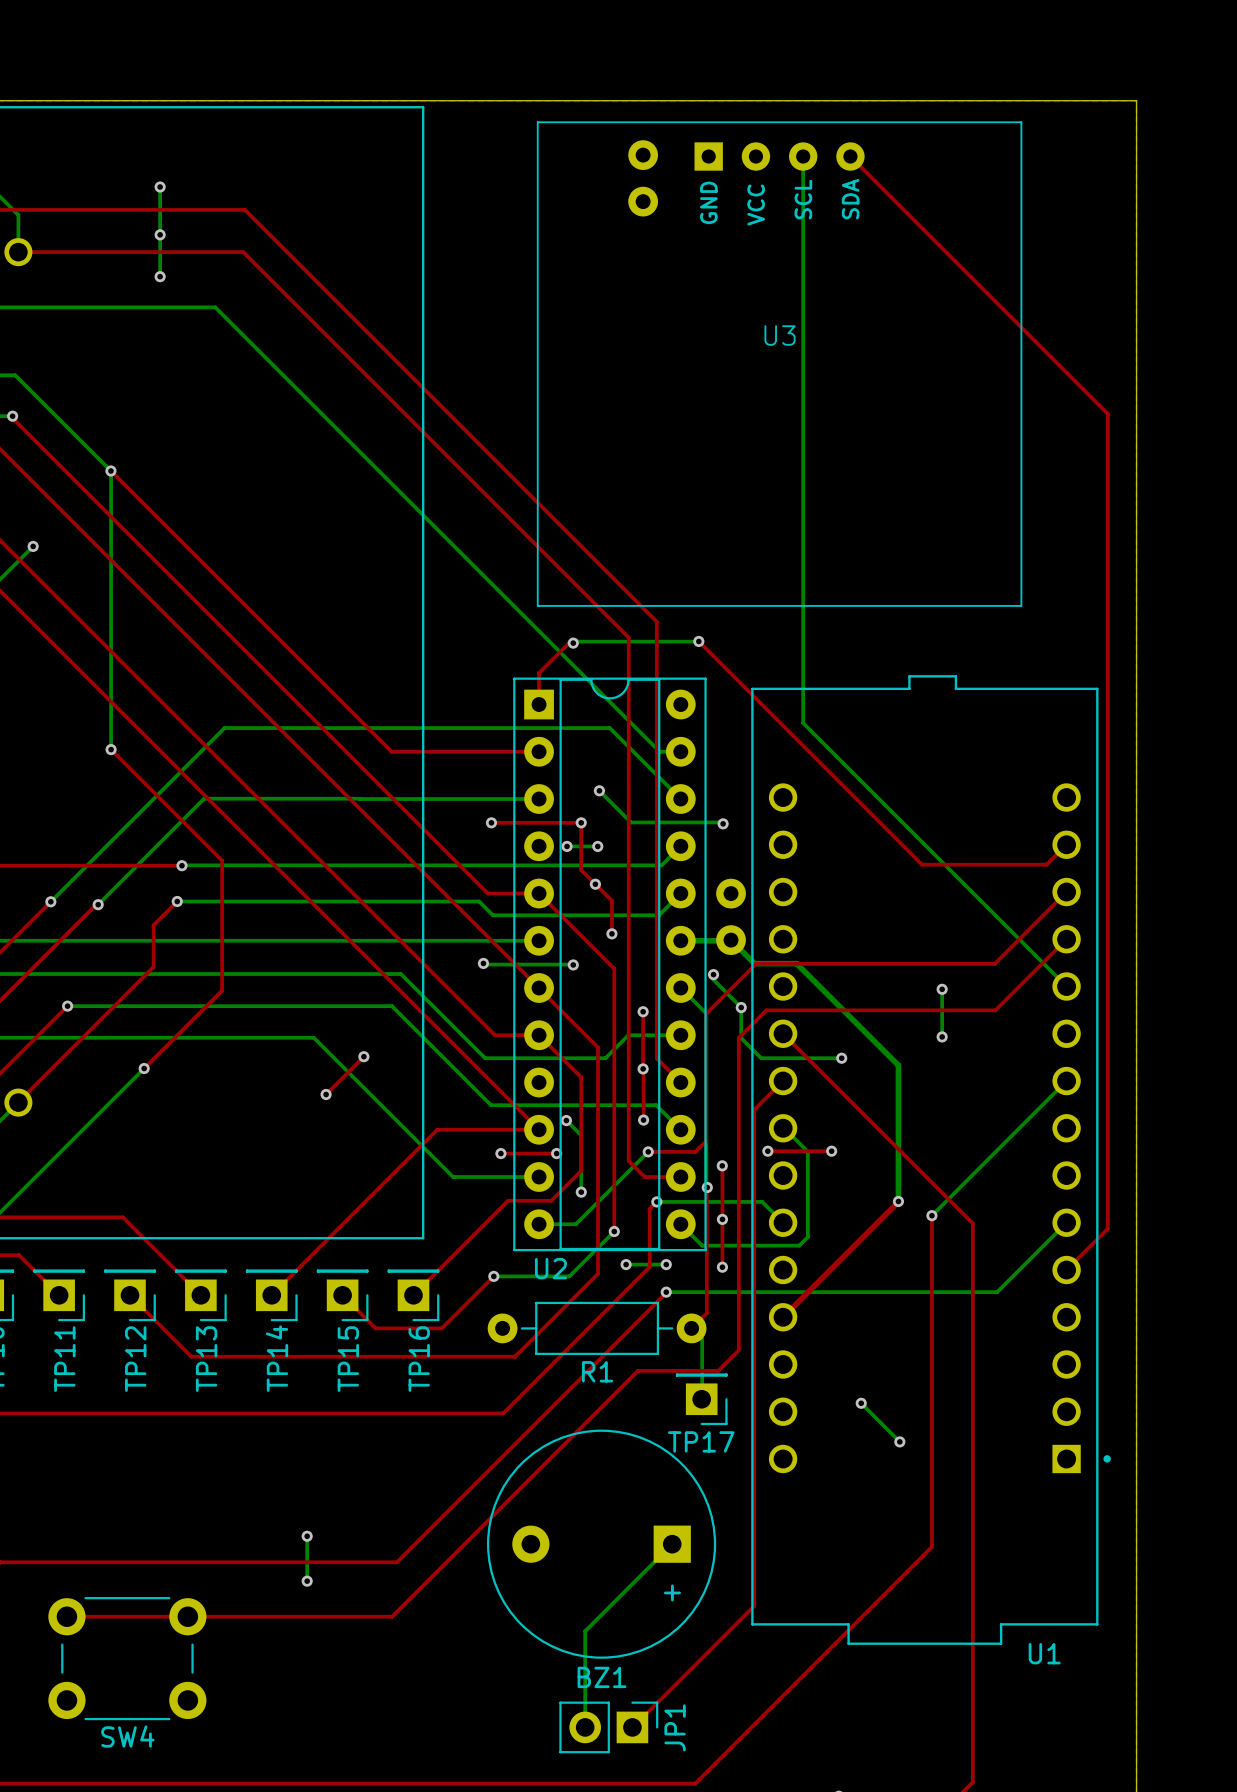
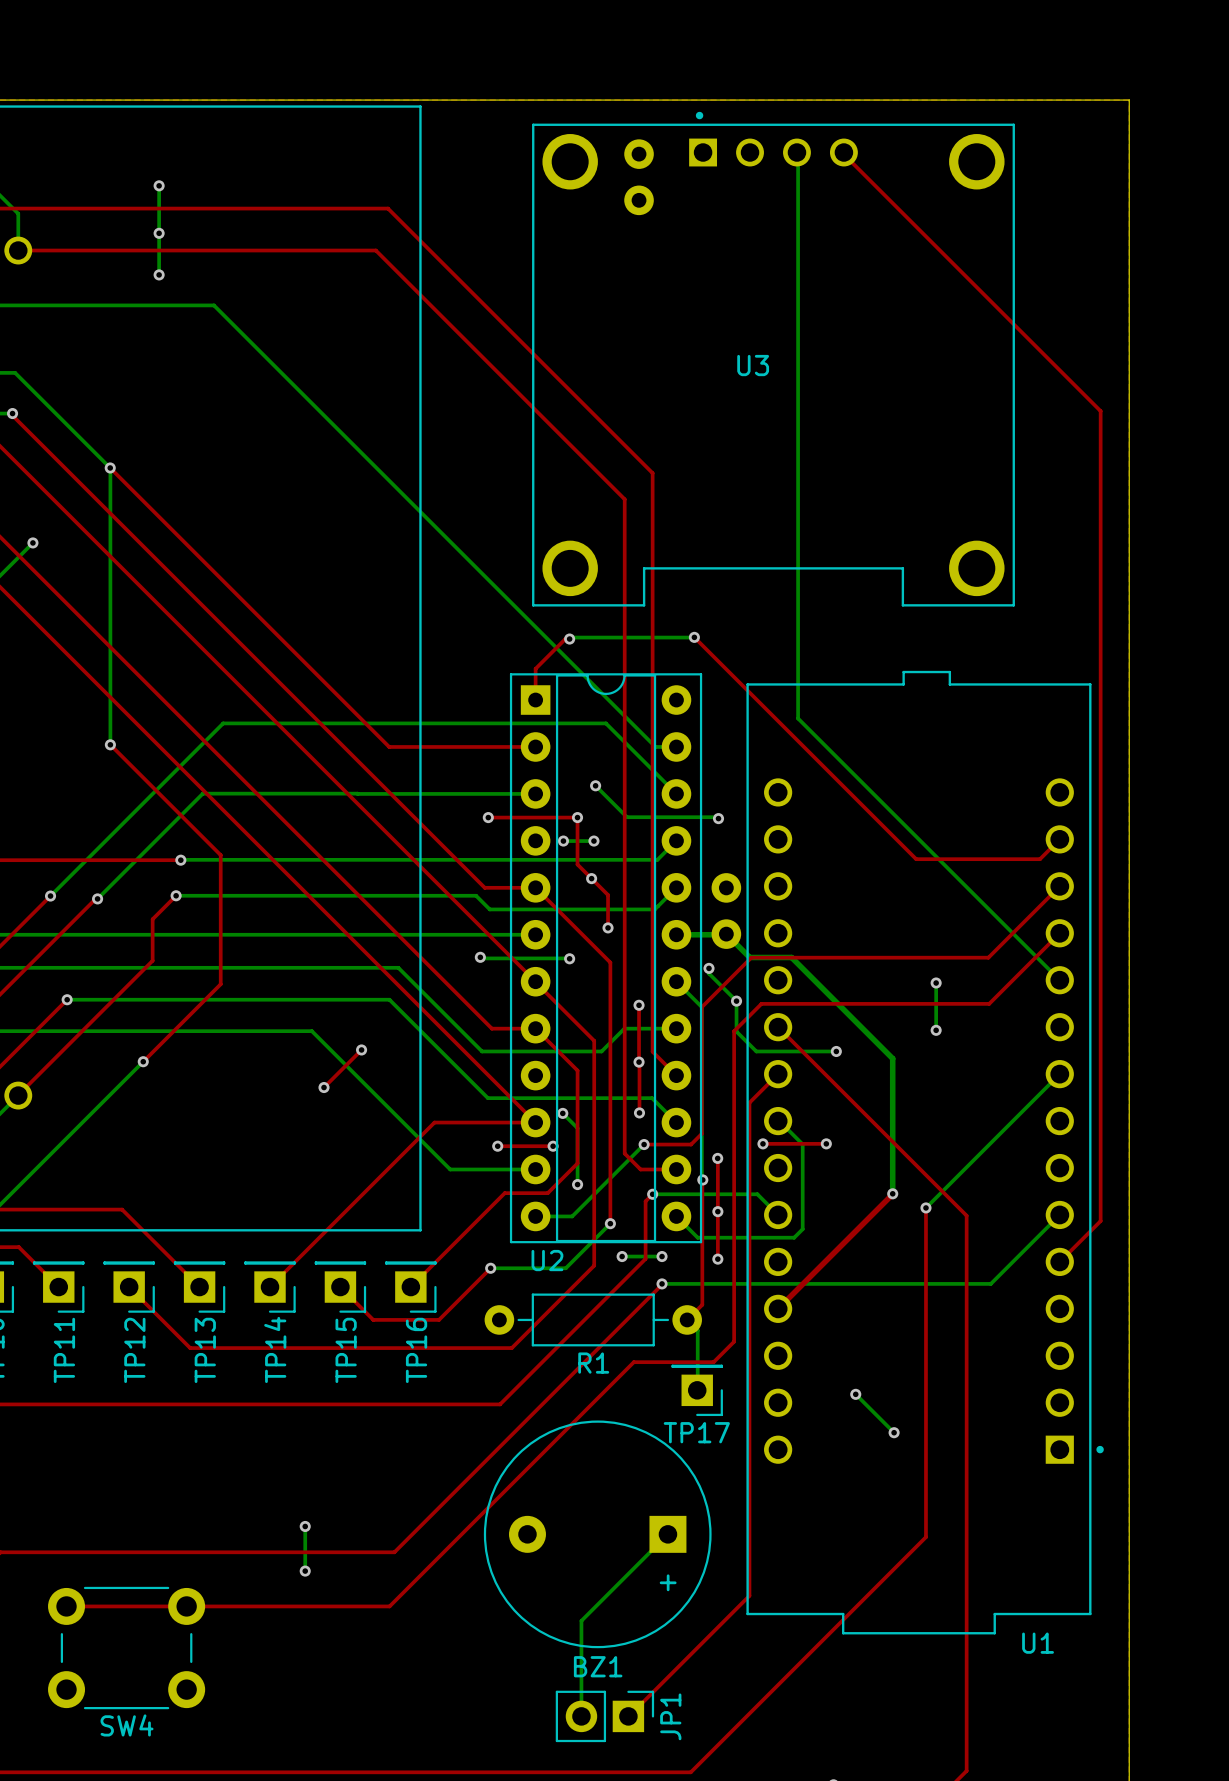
U3 footprint: [536, 121, 1023, 607] -> [532, 111, 1015, 607]
top track: (244, 209) (656, 621) -> (243, 208) (388, 208) (652, 473) (652, 617)
top track: (243, 252) (628, 637) -> (241, 250) (375, 250) (624, 499) (624, 633)
U3 name position: U3 (780, 335) -> U3 (753, 365)

